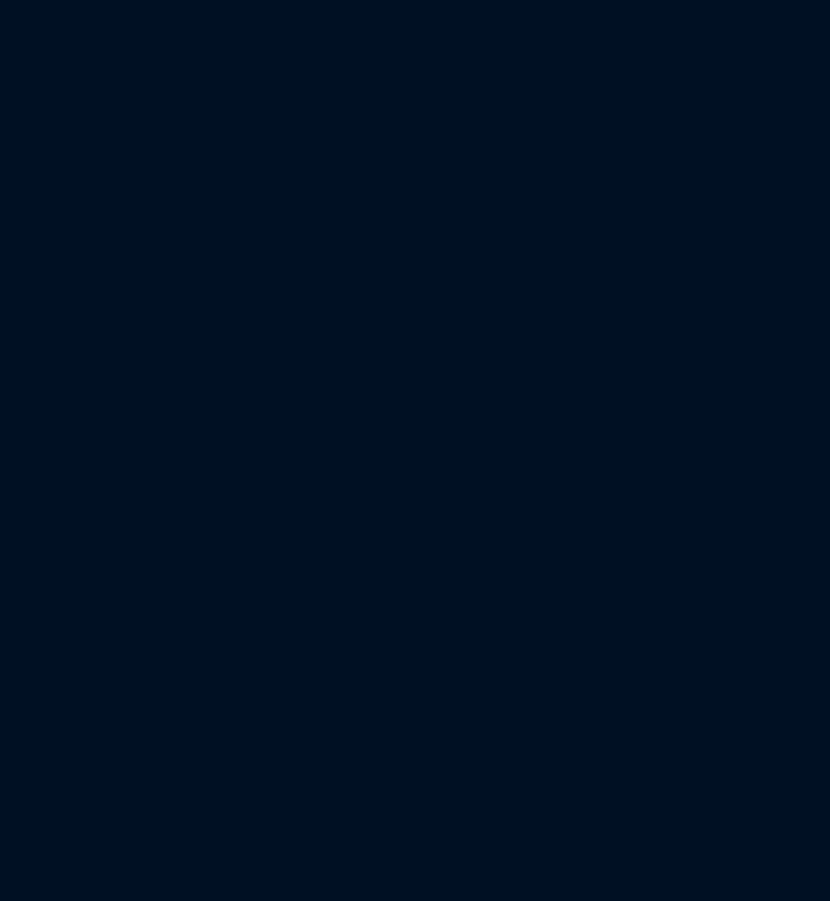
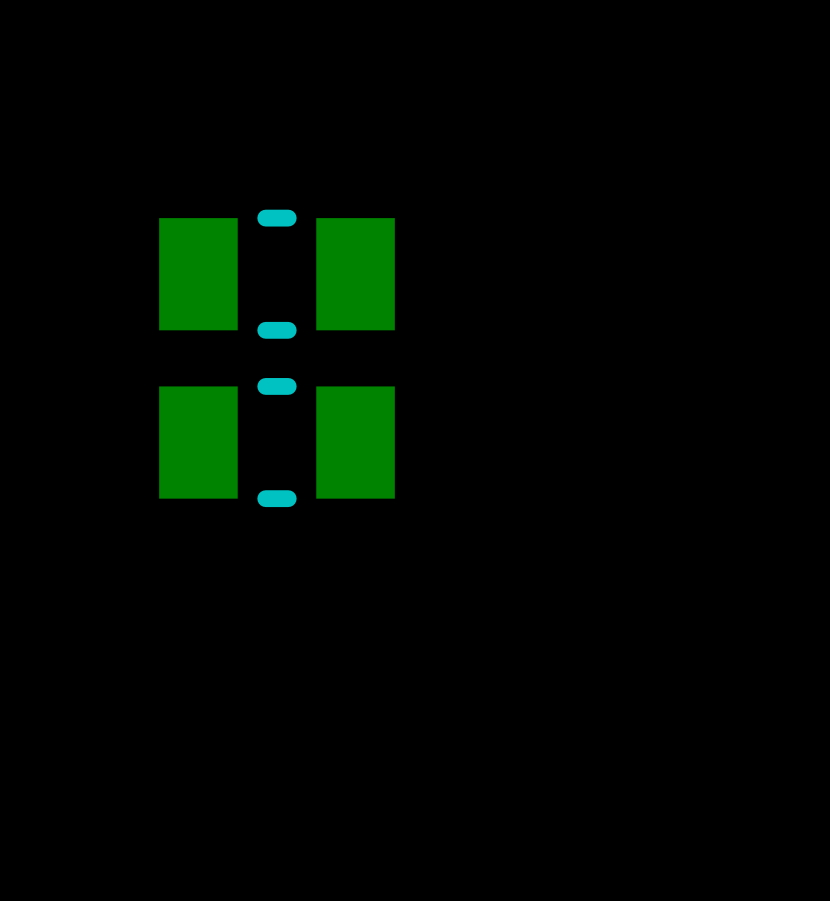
part: none -> (276, 274)
part: none -> (276, 442)

